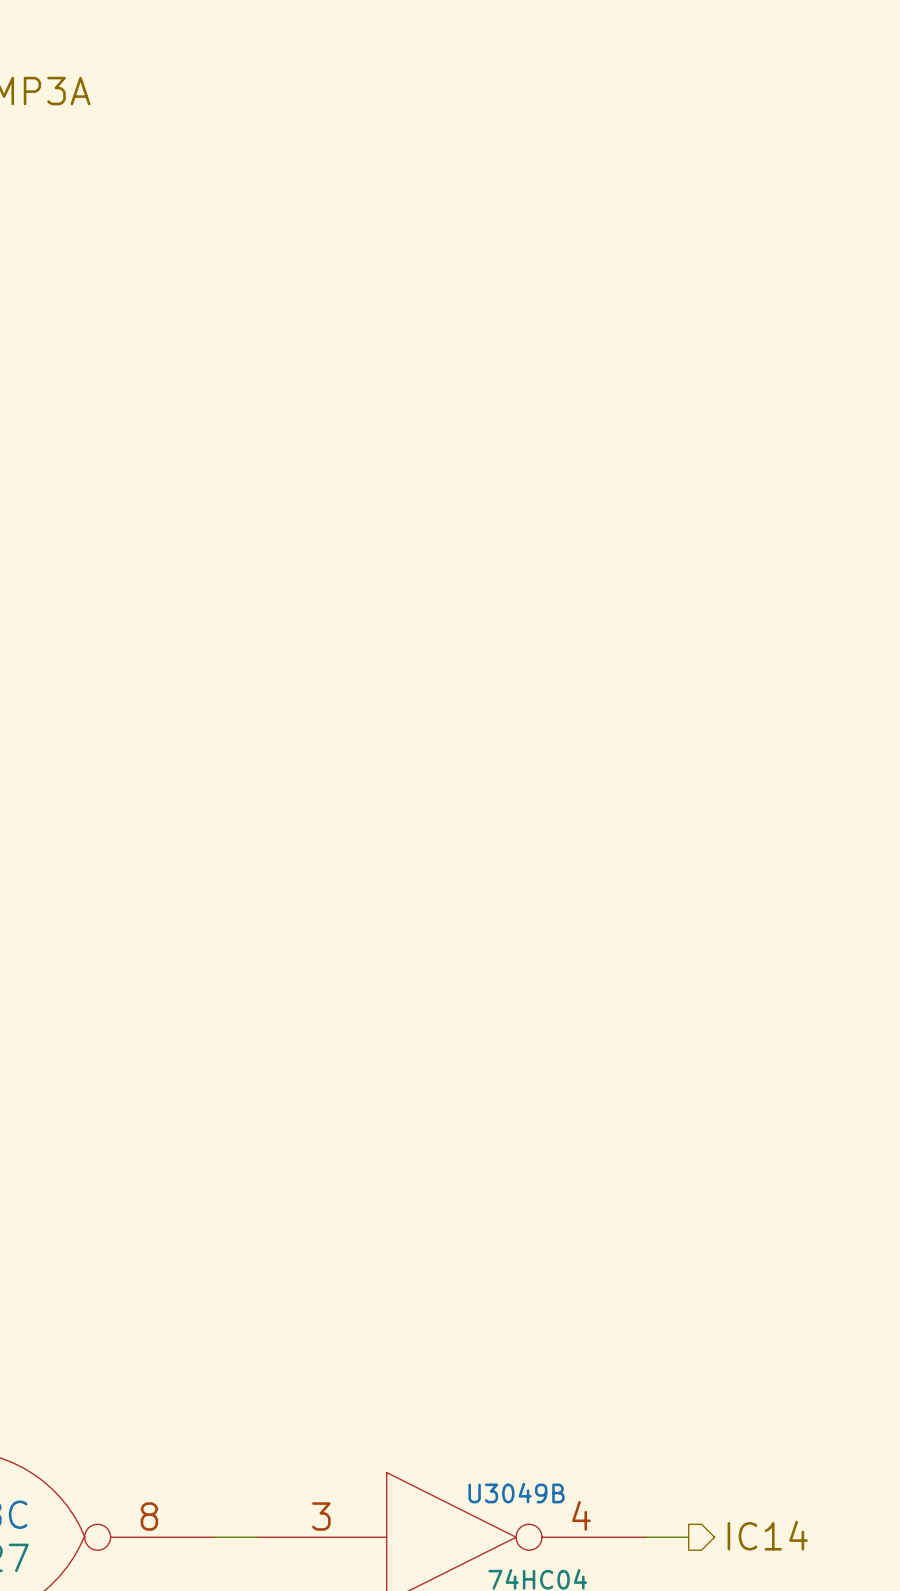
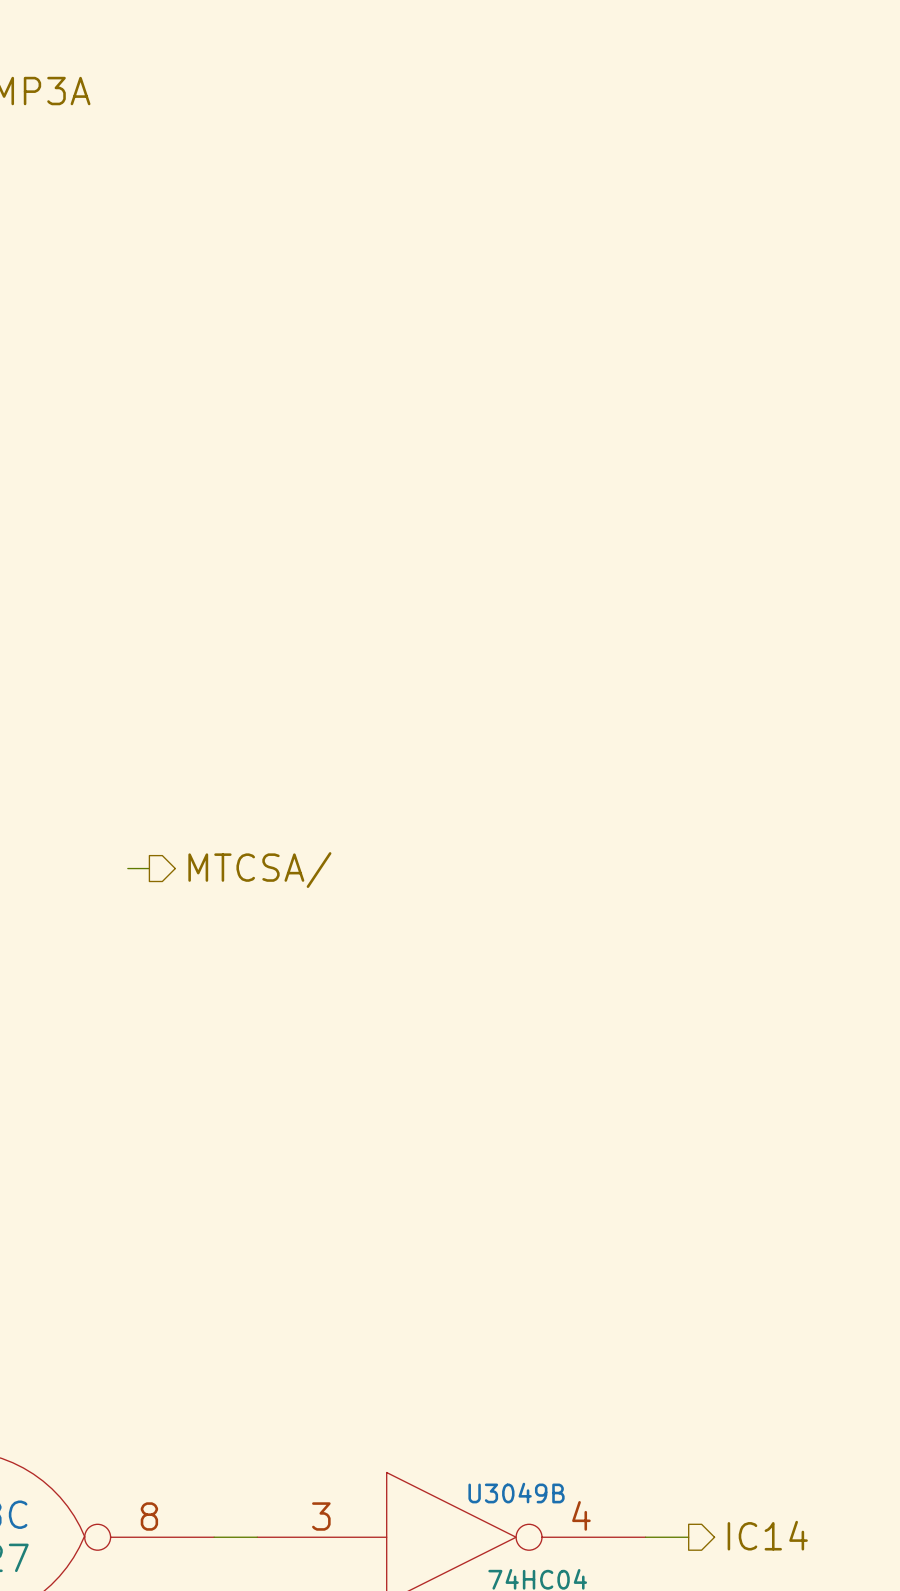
wire: none -> (127, 868) (149, 868)
hierarchical label: none -> MTCSA/ (259, 870)

